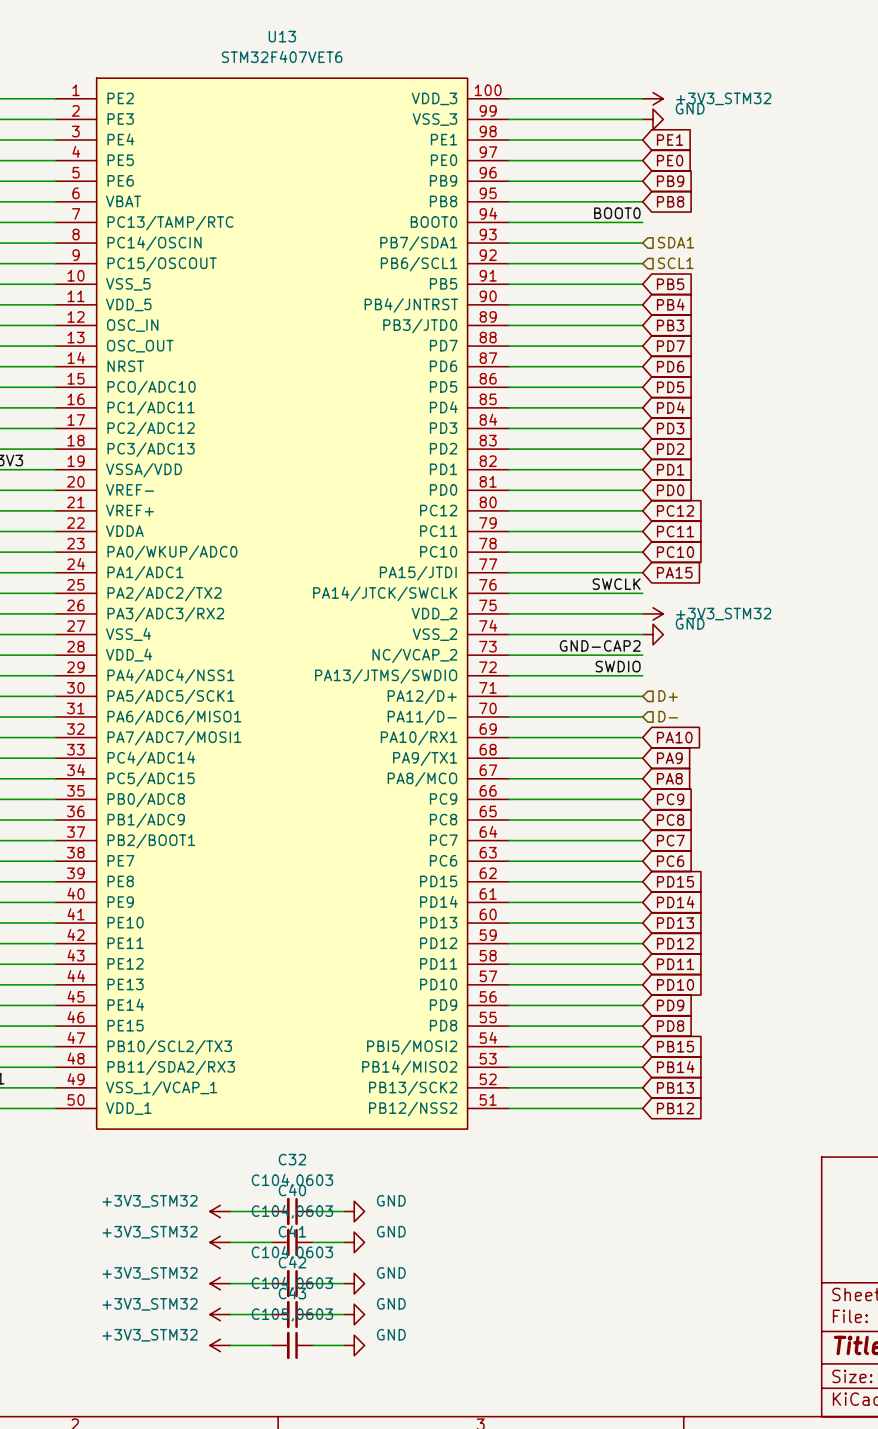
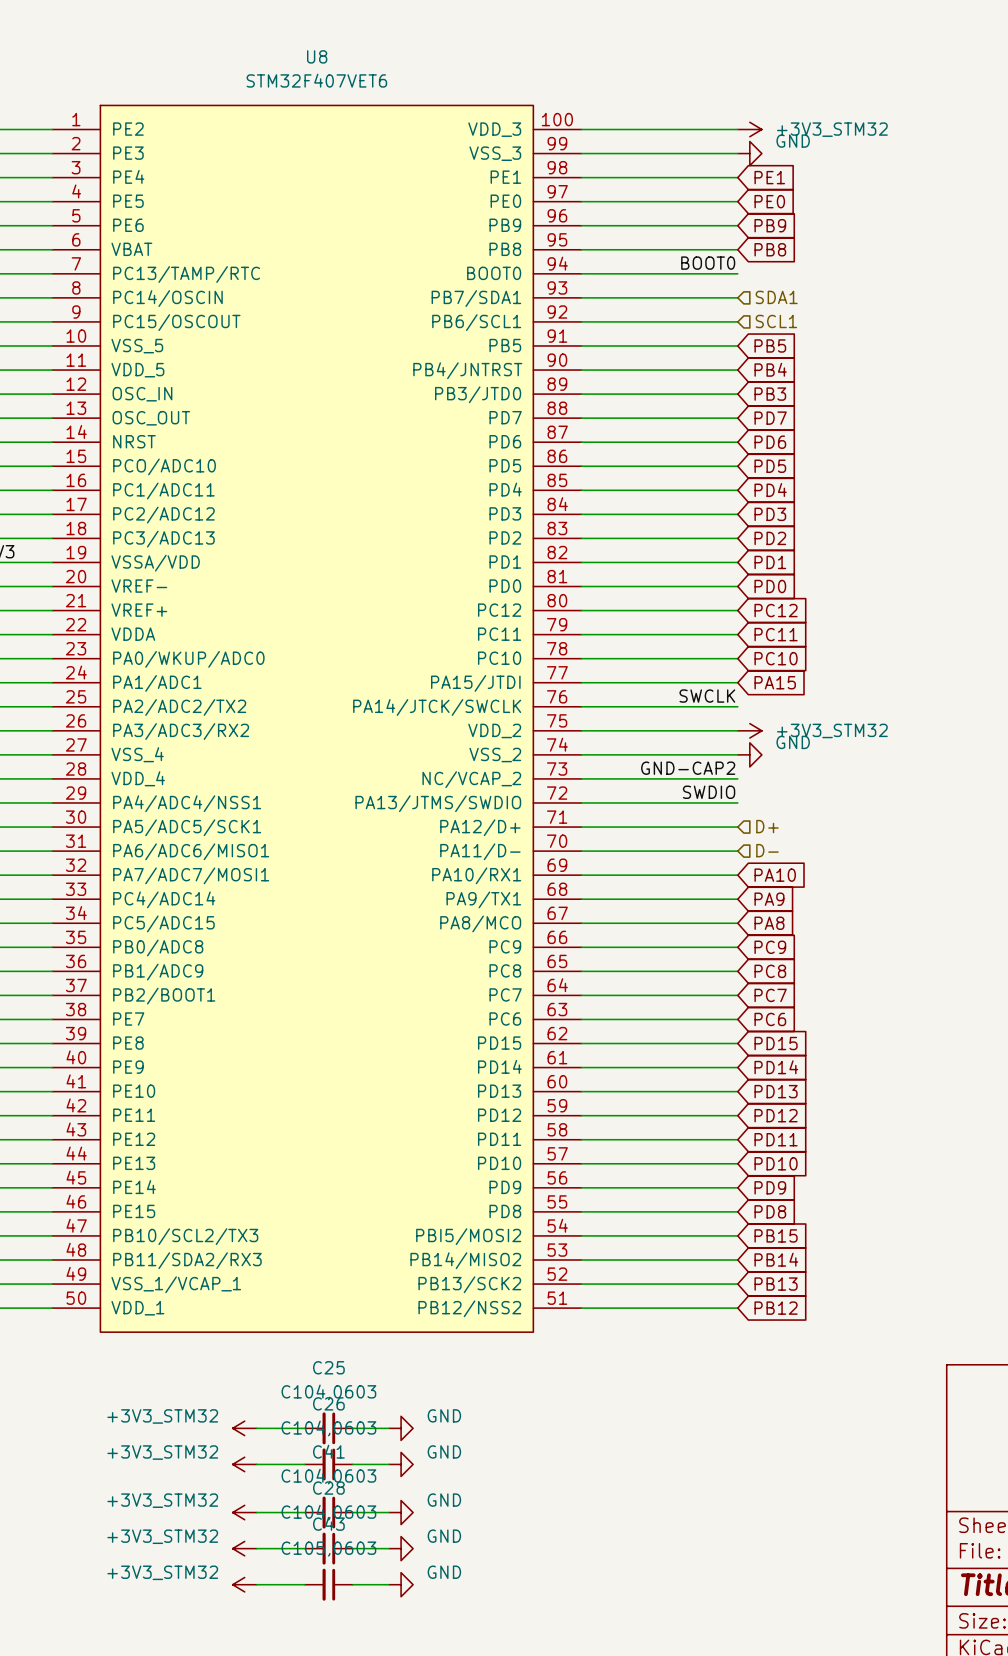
U13 name: U13 (282, 36) -> U8 (317, 56)
C32 name: C32 (292, 1159) -> C25 (328, 1367)
C40 name: C40 (292, 1190) -> C26 (328, 1403)
C42 name: C42 (292, 1262) -> C28 (328, 1488)

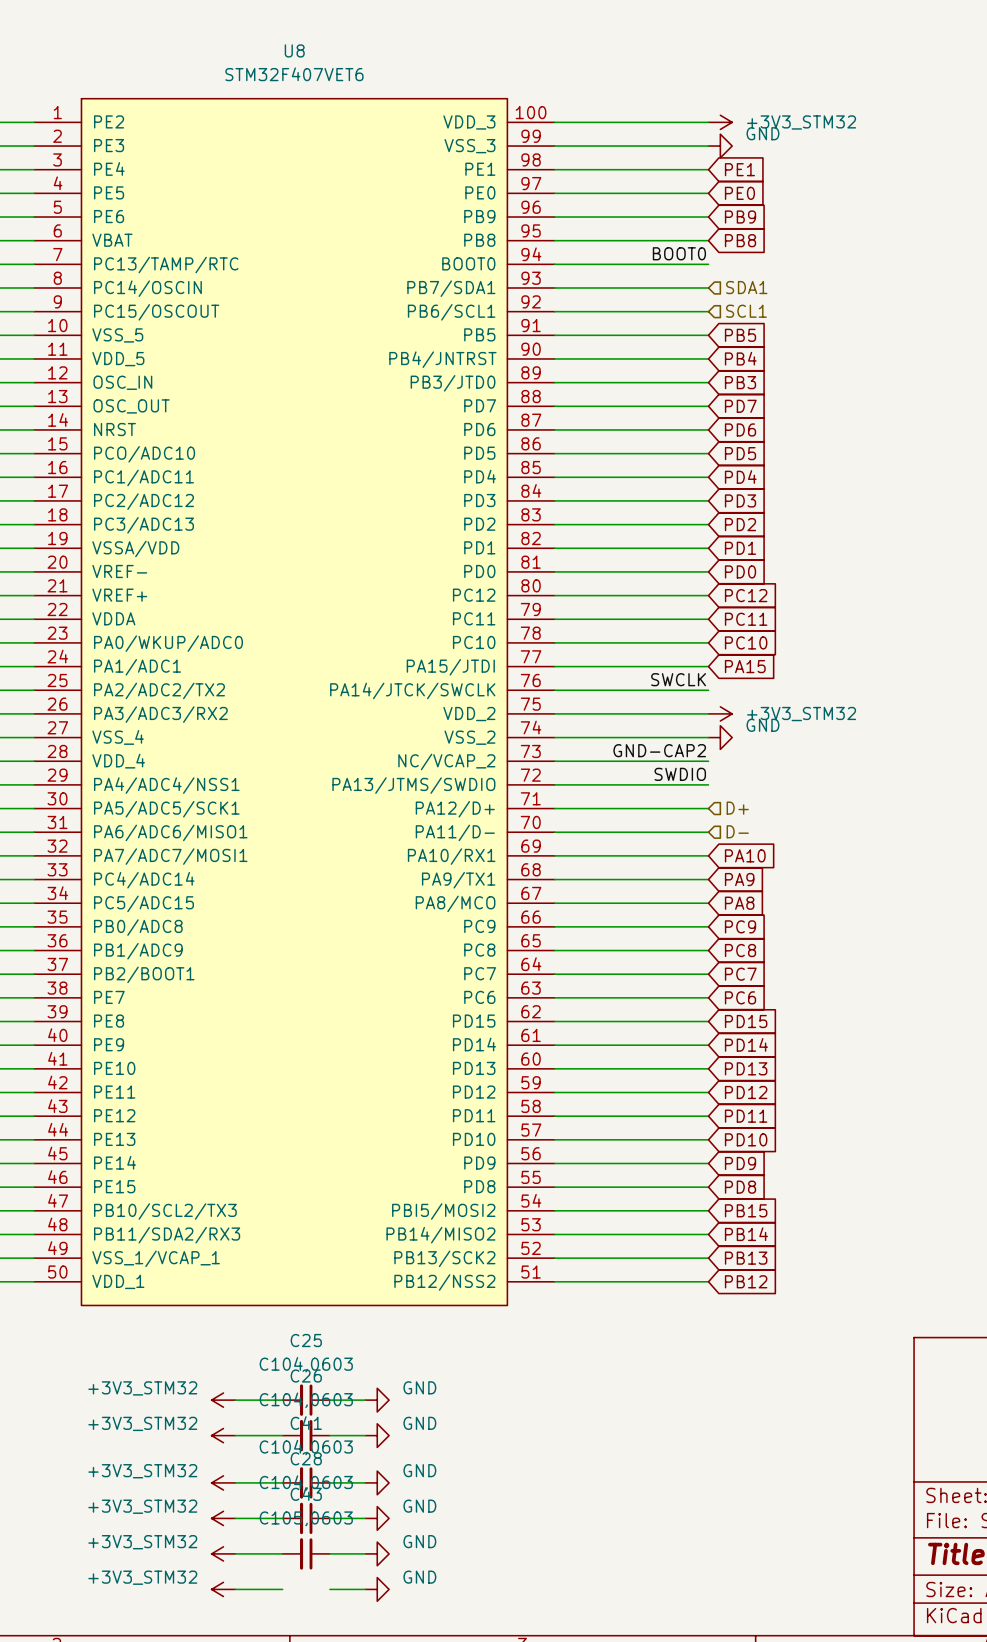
power symbol: none -> +3V3_STM32 (223, 1589)
wire: none -> (235, 1589) (282, 1589)
wire: none -> (329, 1589) (365, 1589)
power symbol: none -> GND (377, 1589)

